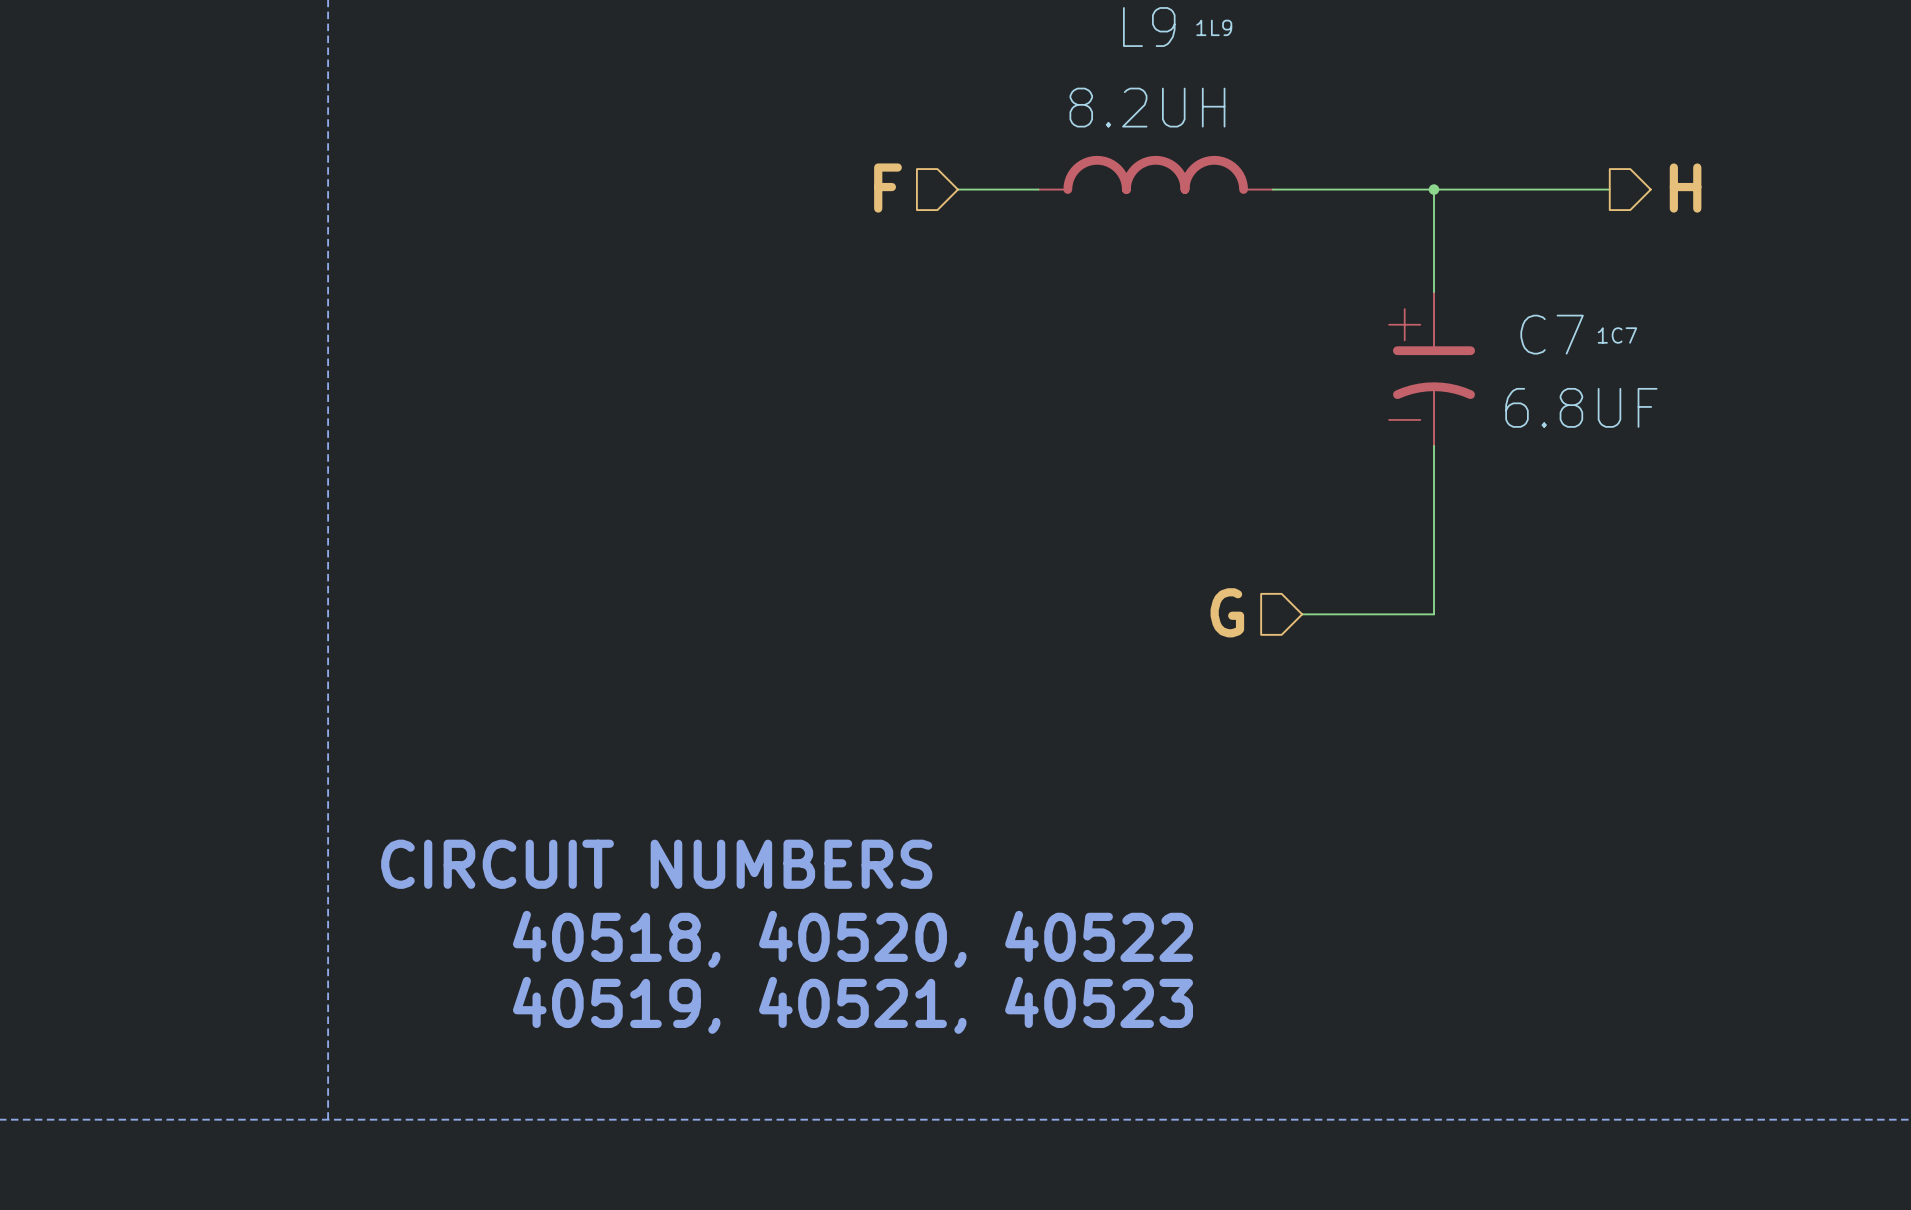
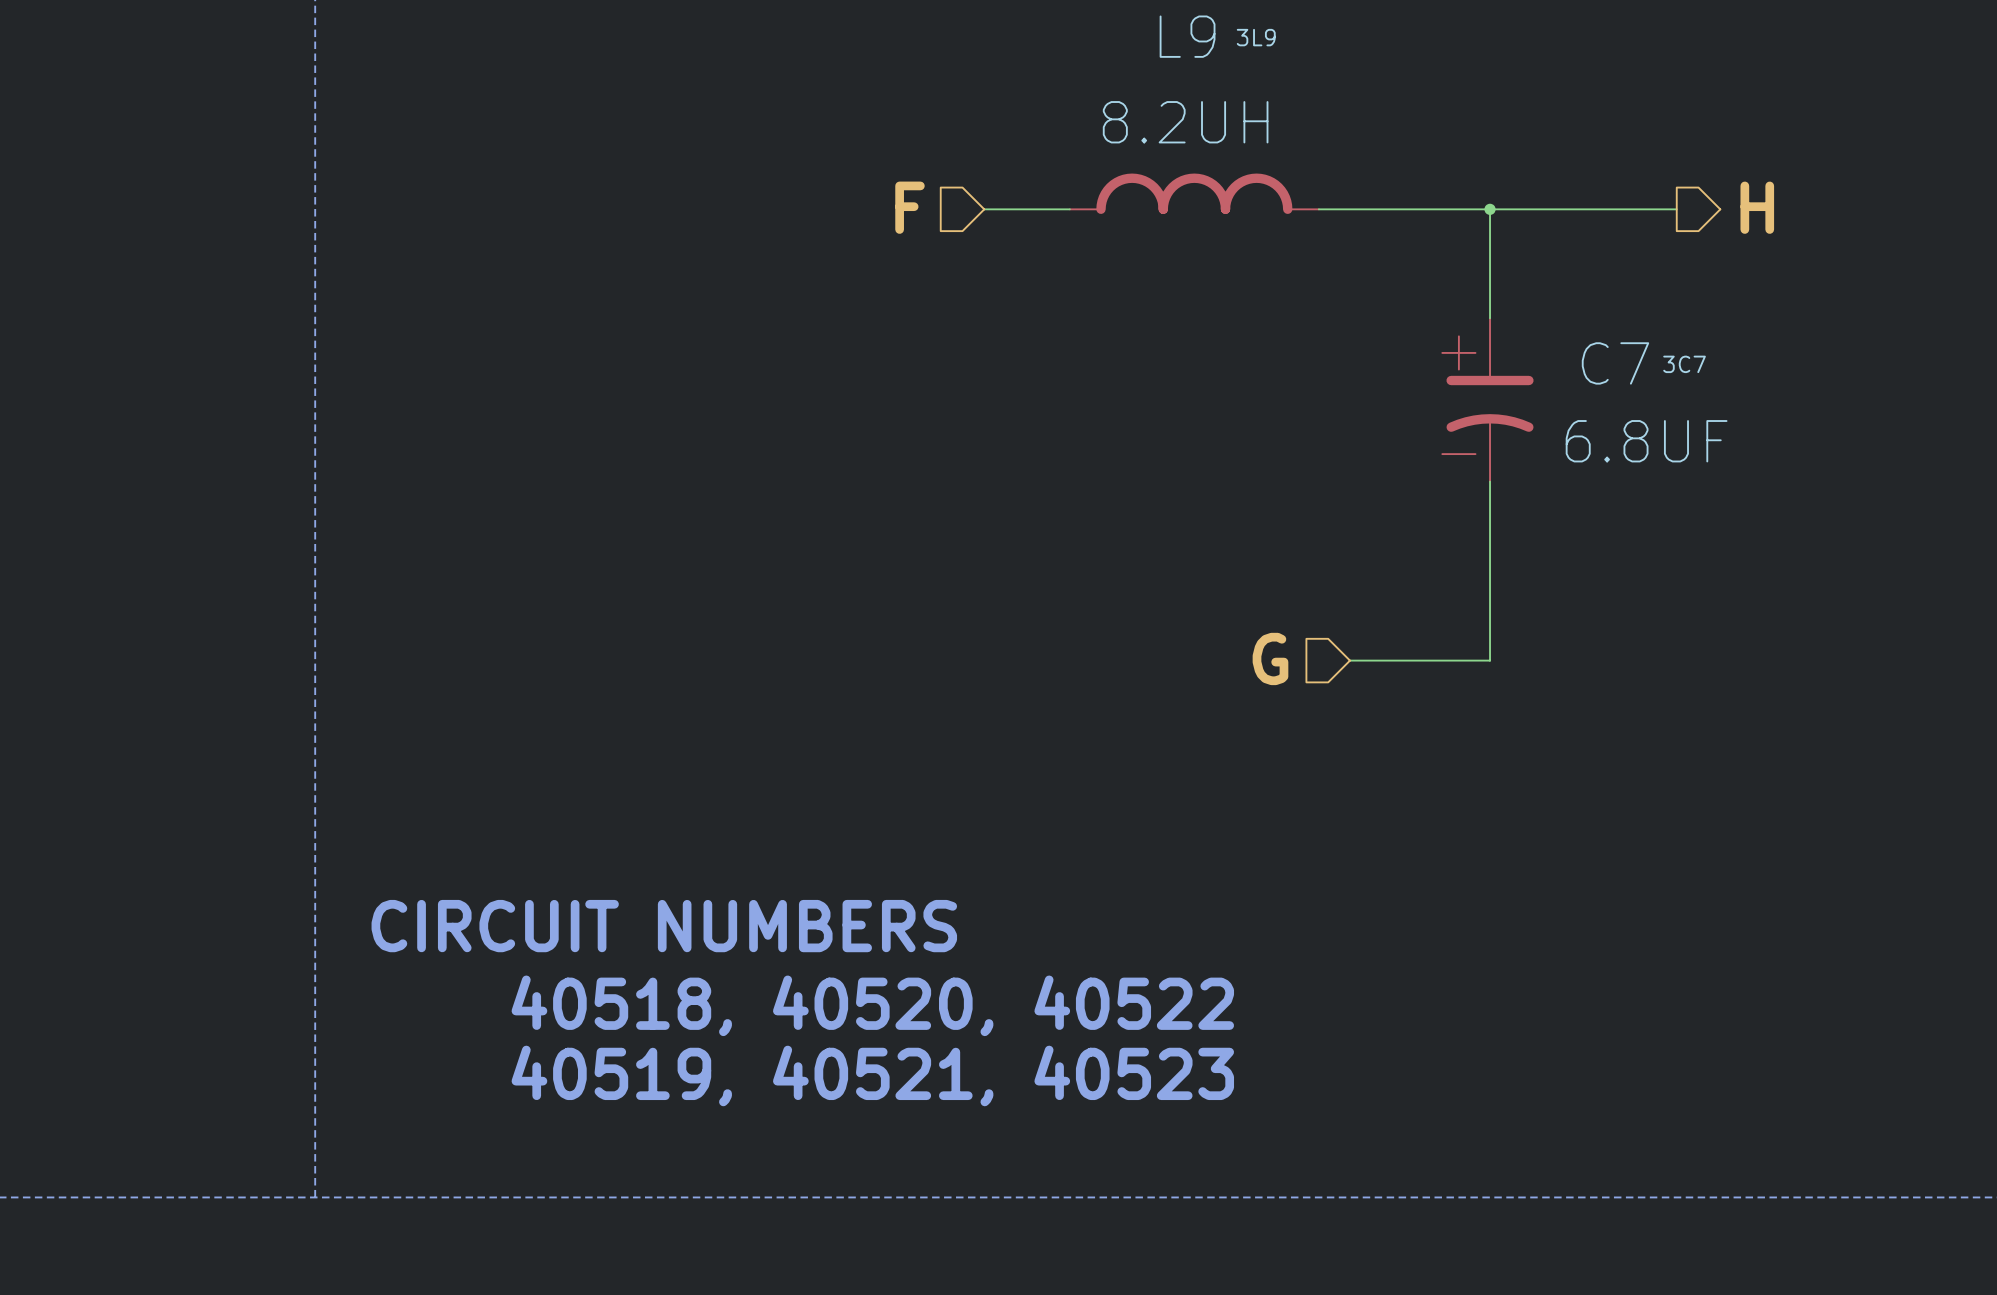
1L9 name: 1L9 (1214, 27) -> 3L9 (1256, 37)
1C7 name: 1C7 (1617, 335) -> 3C7 (1684, 364)

